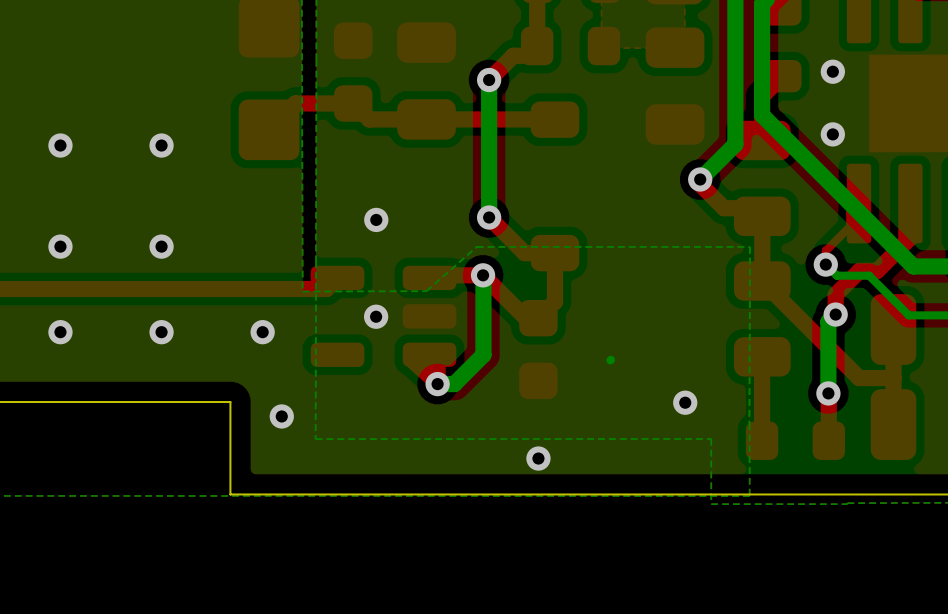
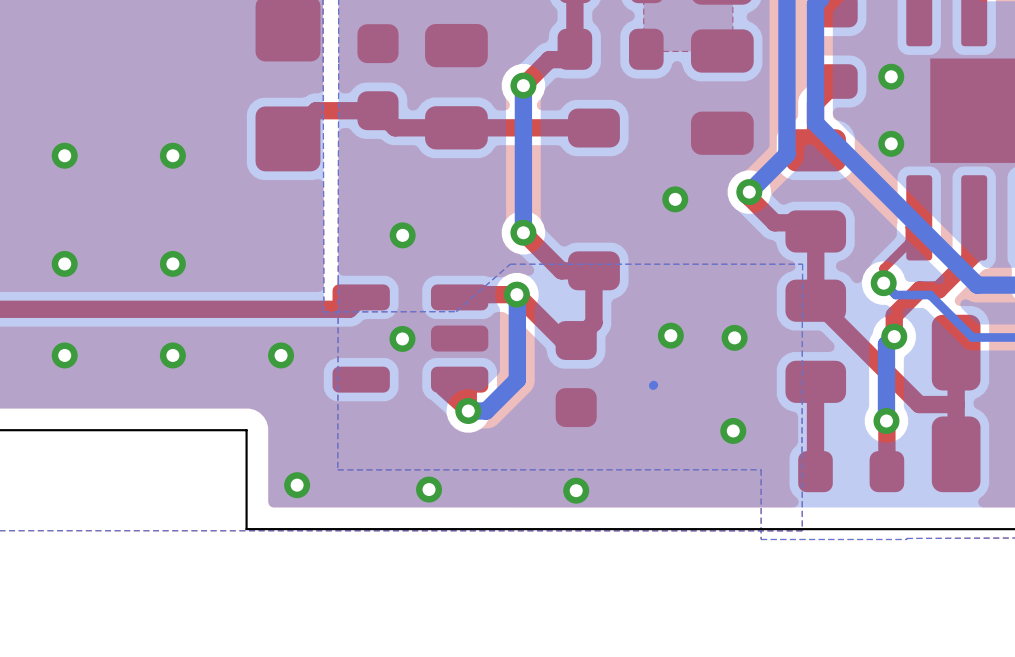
via: none -> (675, 199)
via: none -> (670, 335)
via: none -> (734, 337)
via position: (281, 416) -> (297, 485)
via: none -> (429, 489)

